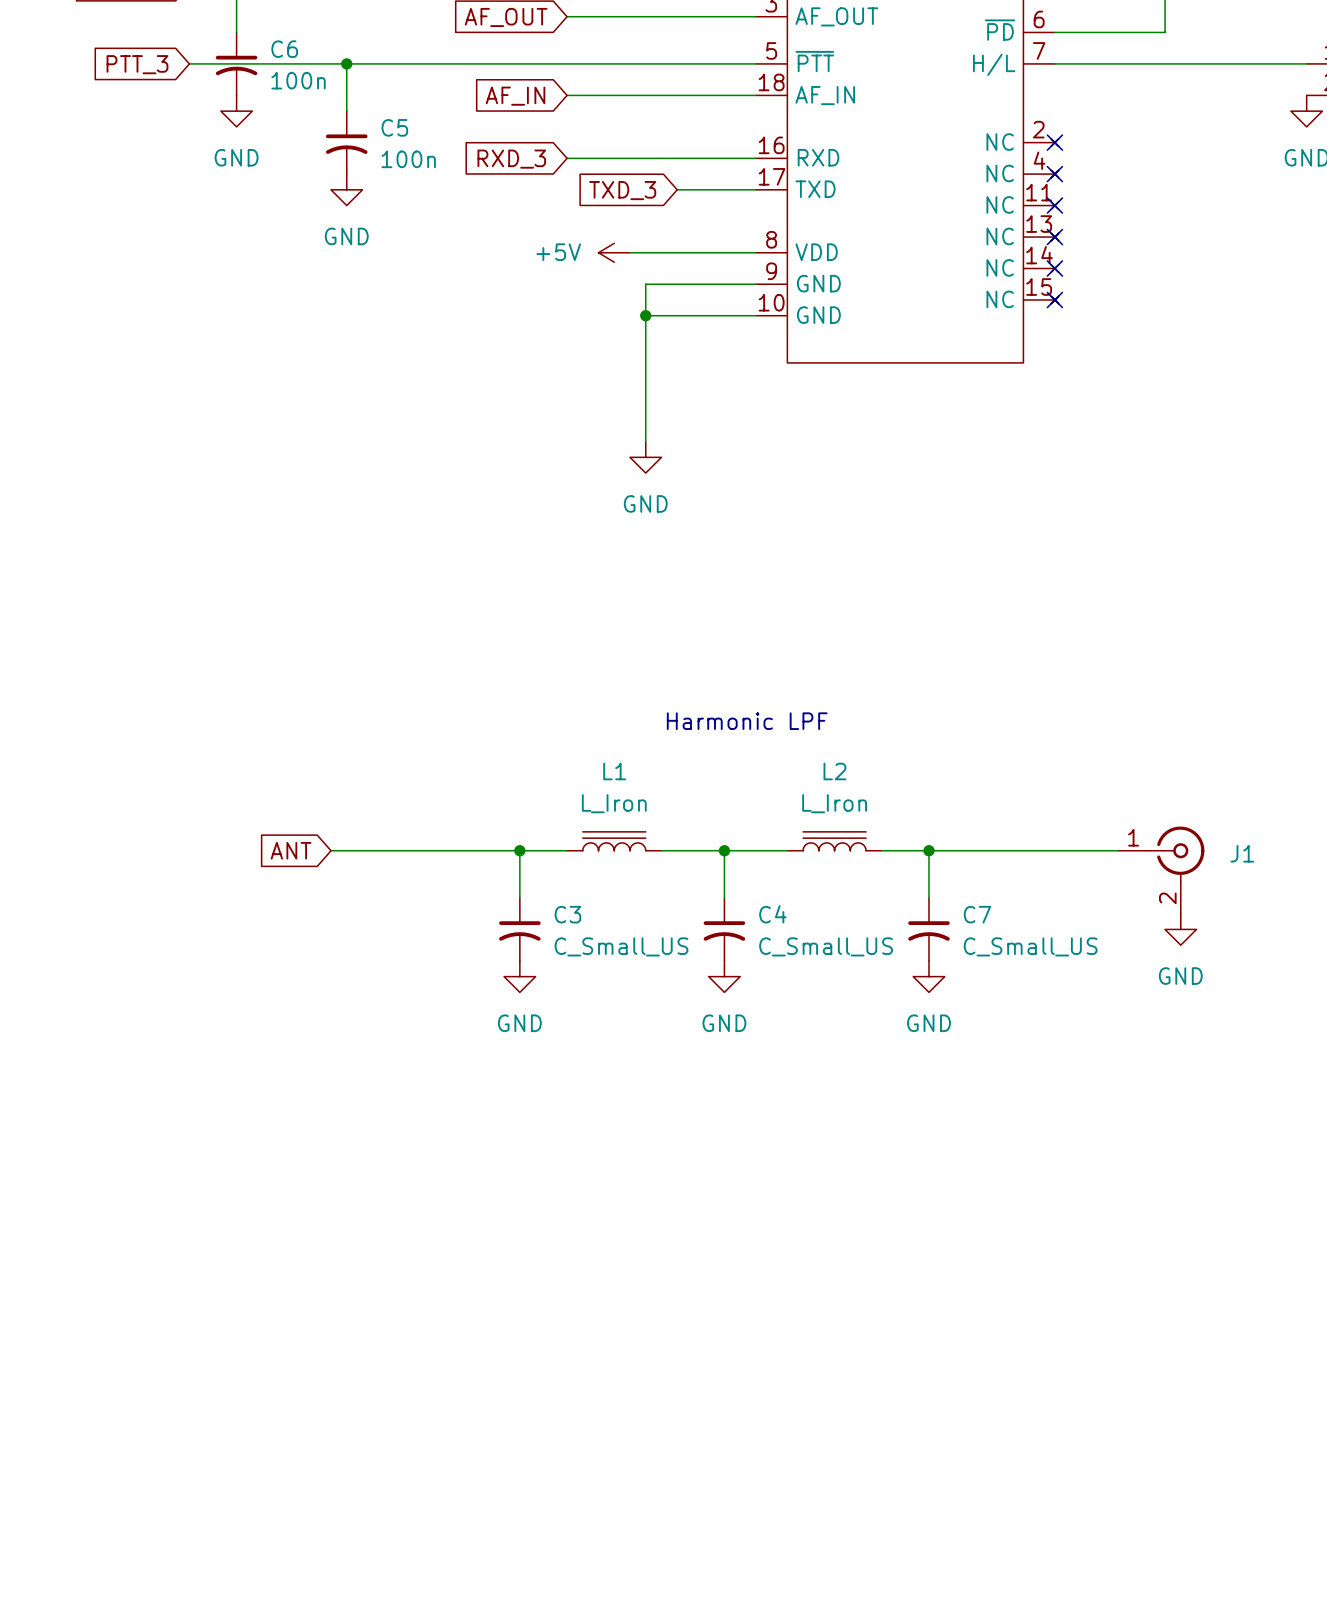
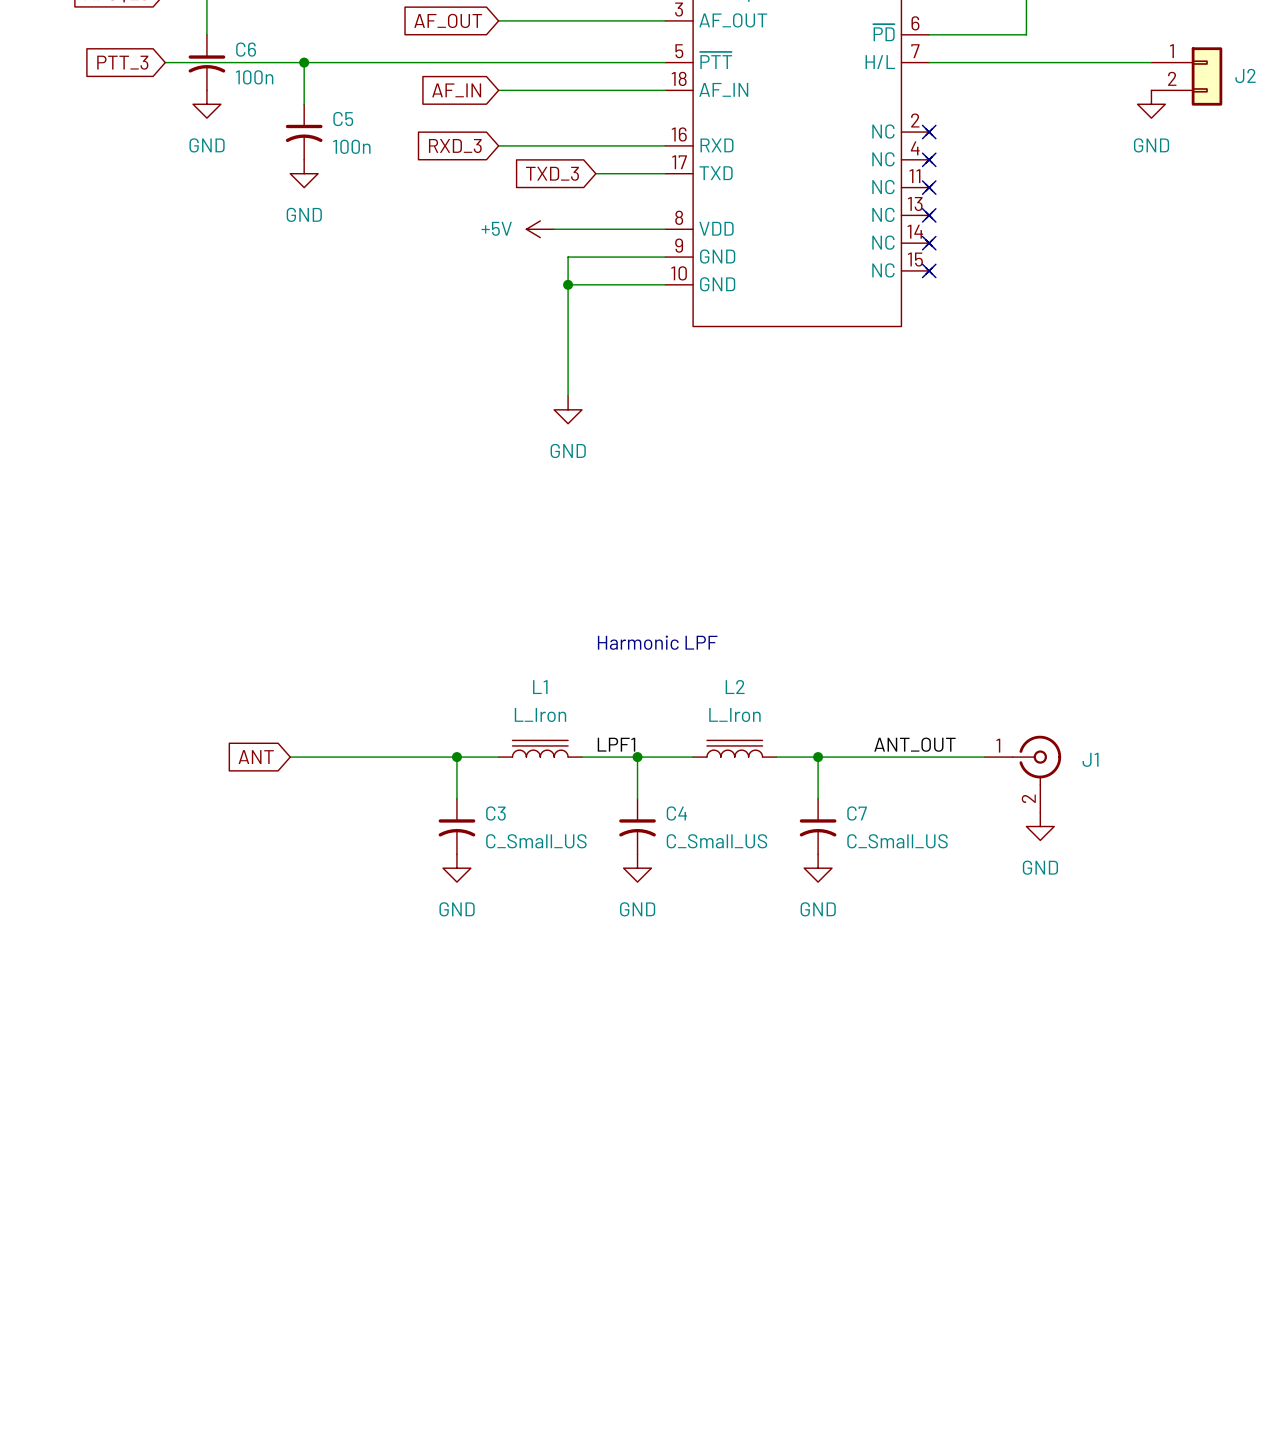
label: none -> LPF1 (616, 744)
label: none -> ANT_OUT (914, 744)

